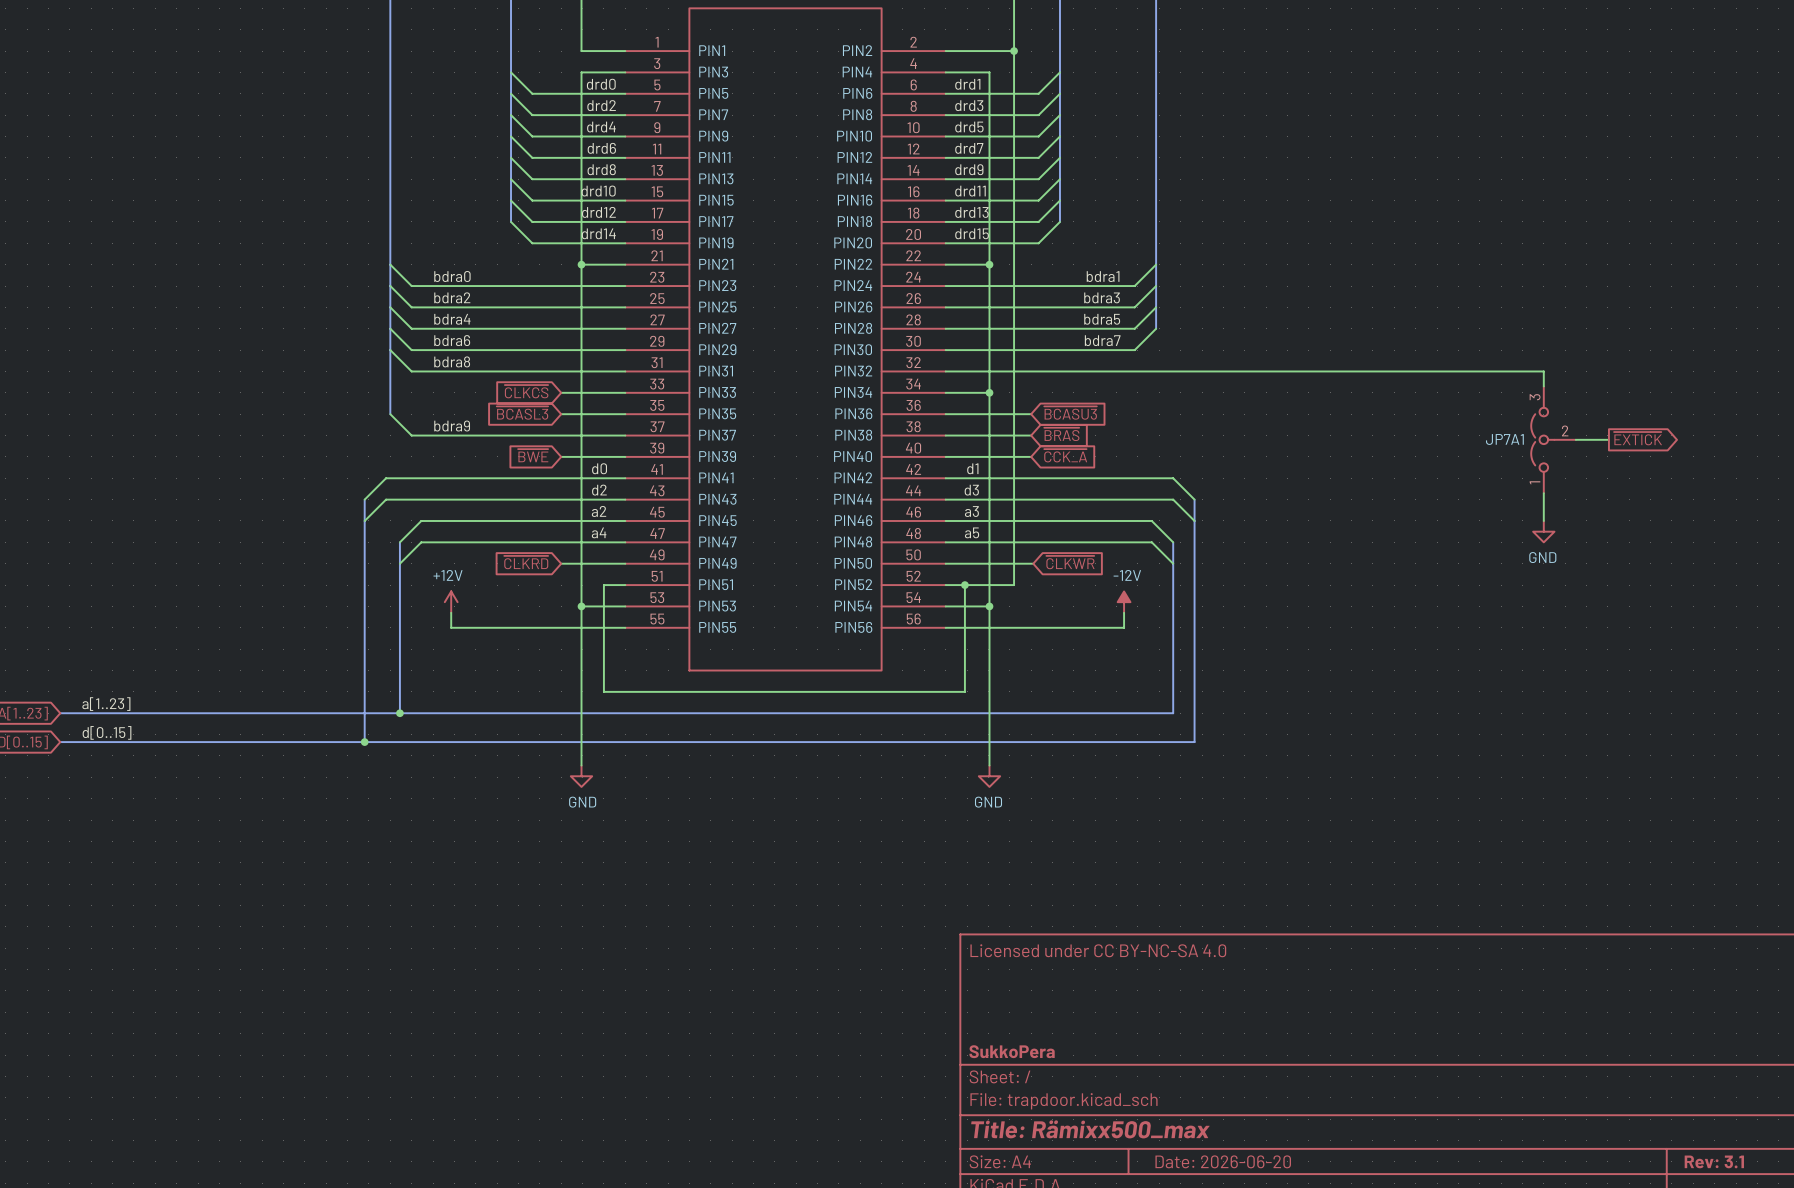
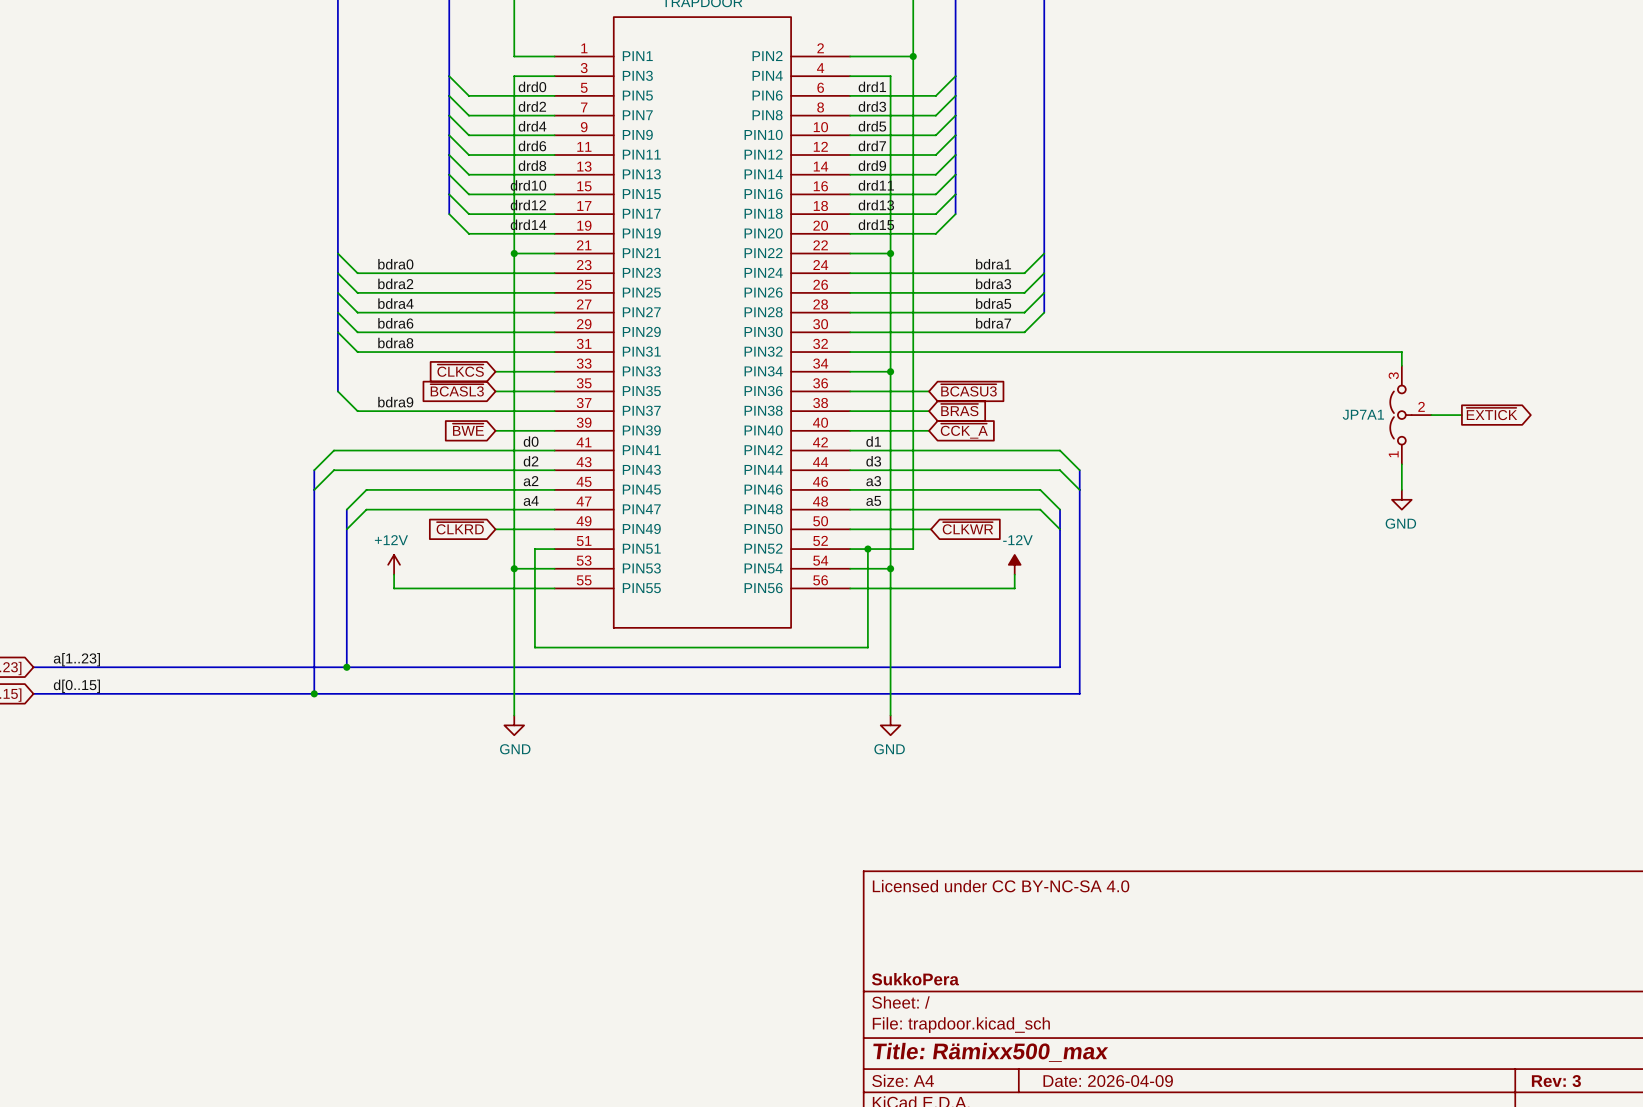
title block: Date: 2026-06-20 (1223, 1161) -> Date: 2026-04-09 (1108, 1081)
title block: Rev: 3.1 (1714, 1161) -> Rev: 3 (1556, 1081)

